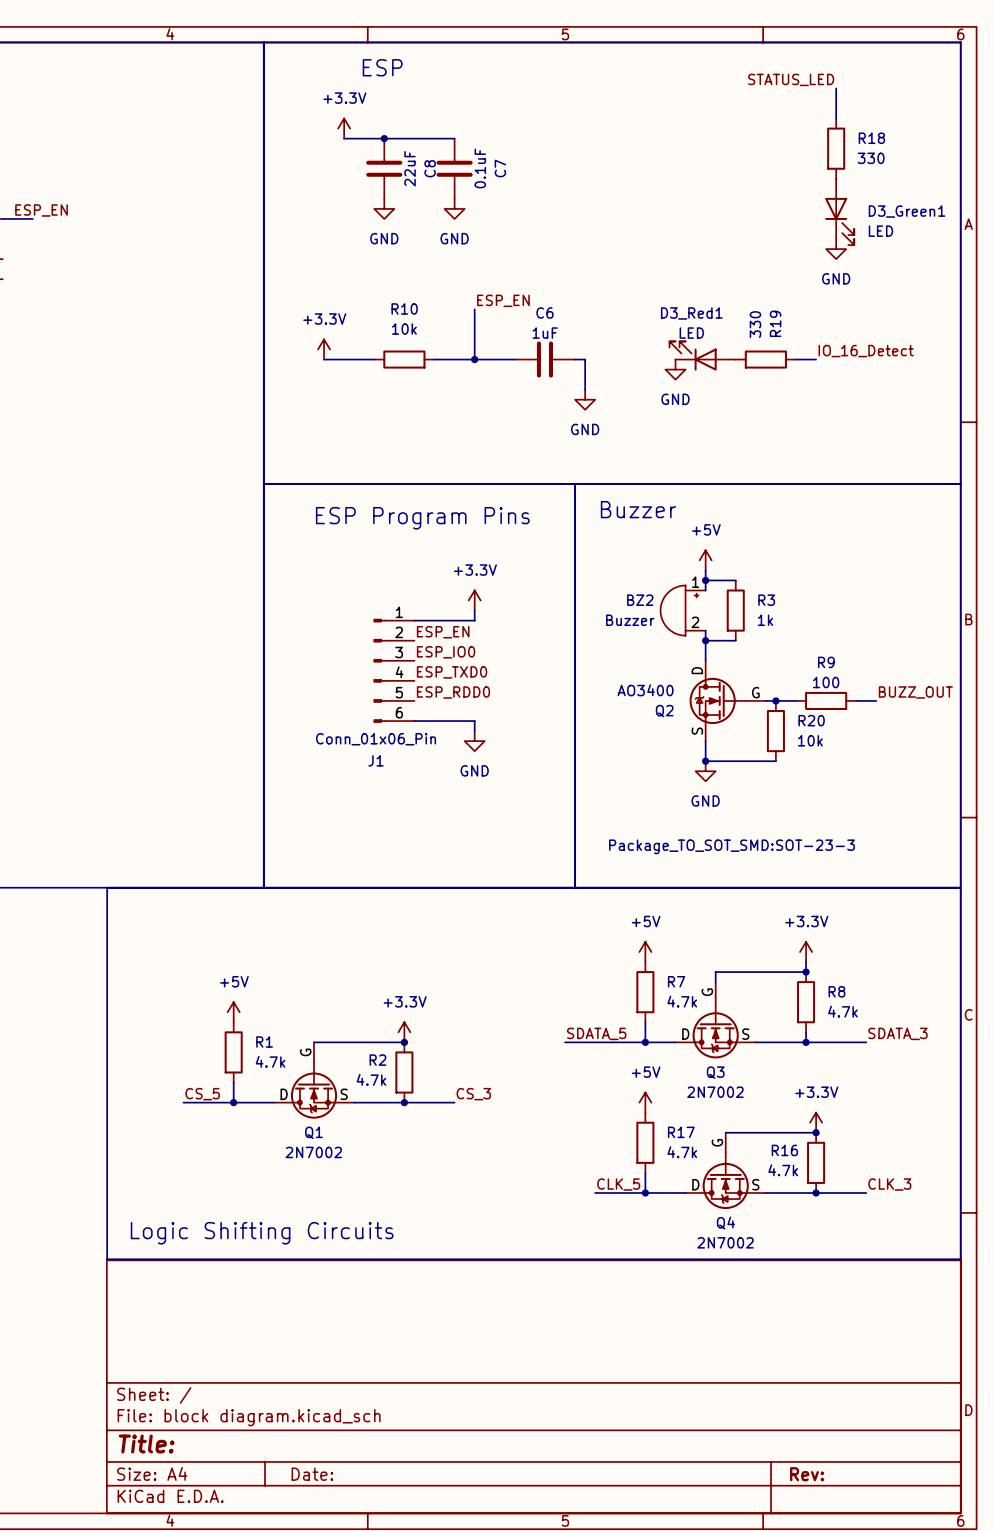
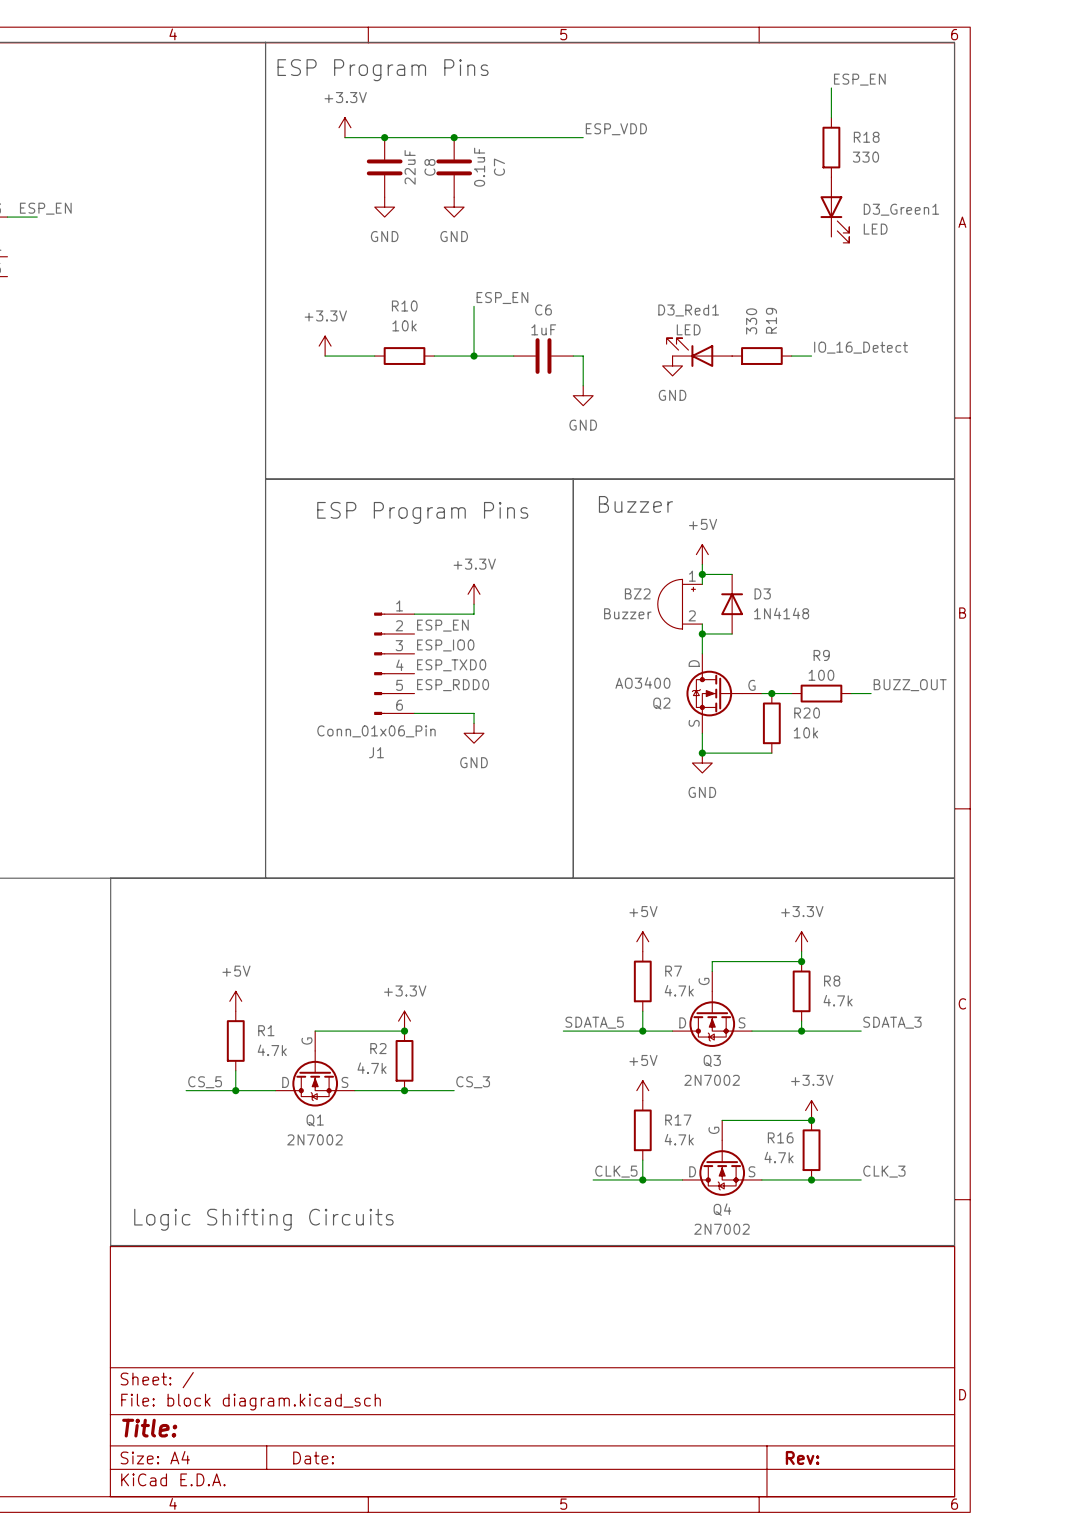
text: ESP (382, 67) -> ESP Program Pins (383, 70)
label: STATUS_LED (791, 79) -> ESP_EN (859, 79)
label: none -> ESP_VDD (616, 129)
wire: none -> (454, 137) (583, 137)
junction: none -> (454, 137)
power symbol: GND (836, 249) -> none
R3: 1k (735, 610) -> none
D3: none -> 1N4148 (732, 604)
Q2 text: Package_TO_SOT_SMD:SOT-23-3 (731, 846) -> none

